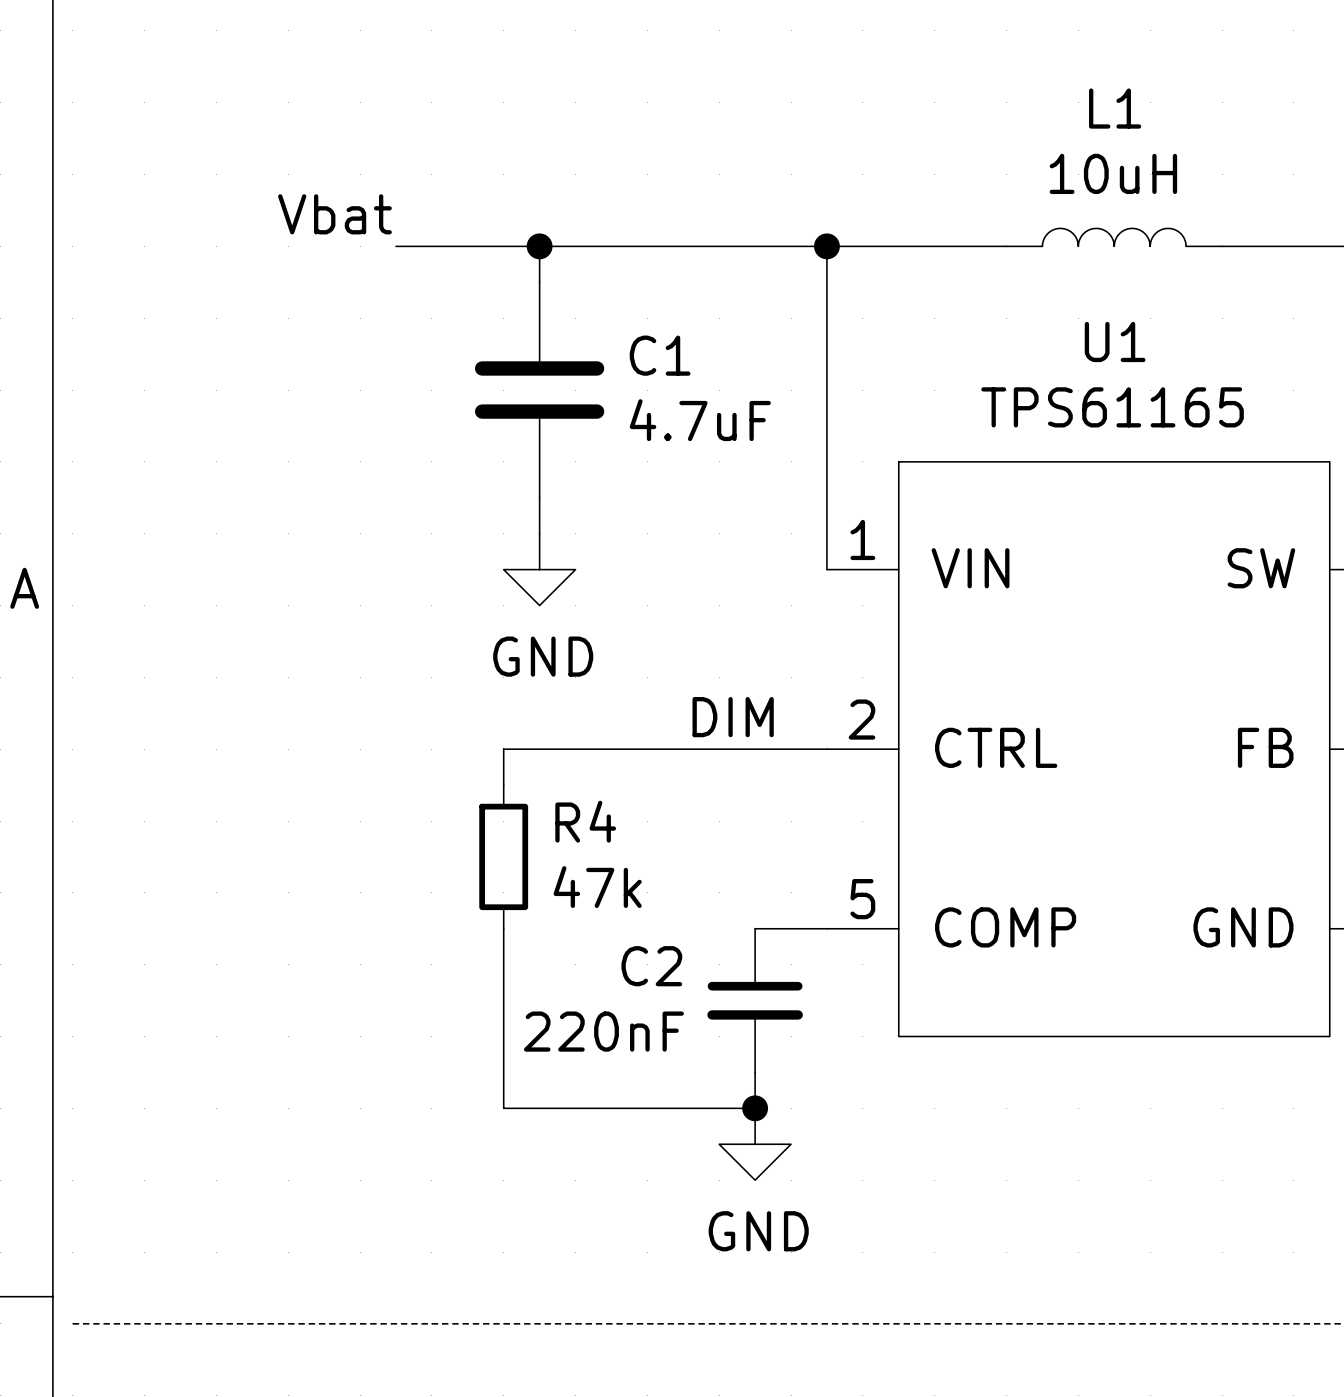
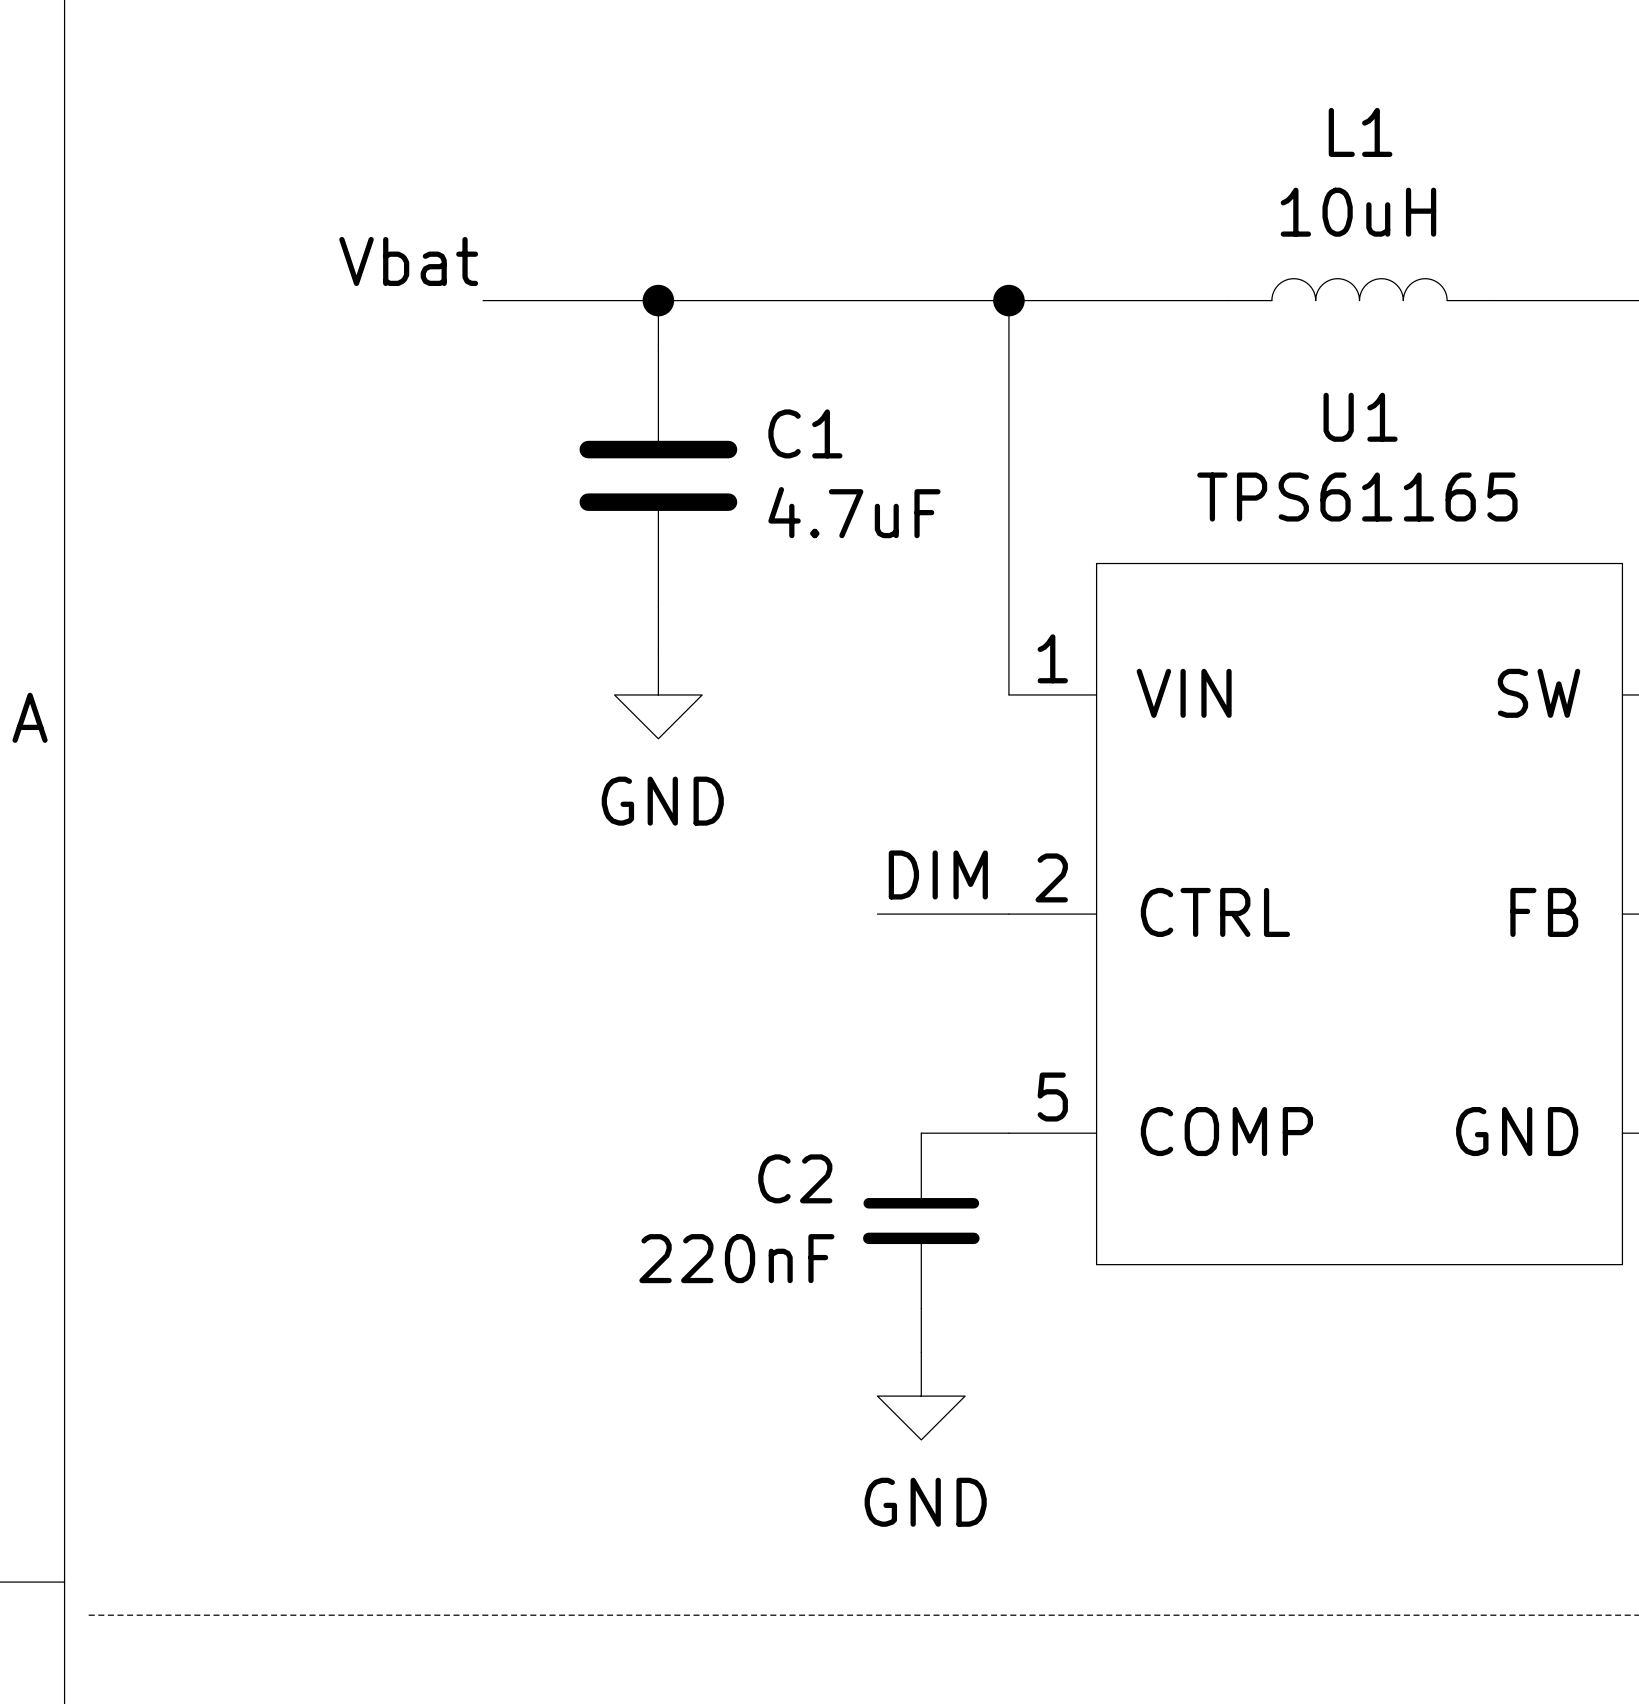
label position: DIM (733, 717) -> DIM (938, 874)
wire: (719, 749) (503, 749) (503, 785) -> none
R4: 47k (503, 856) -> none
wire: (503, 928) (503, 1108) (755, 1108) -> none
junction: (755, 1108) -> none

